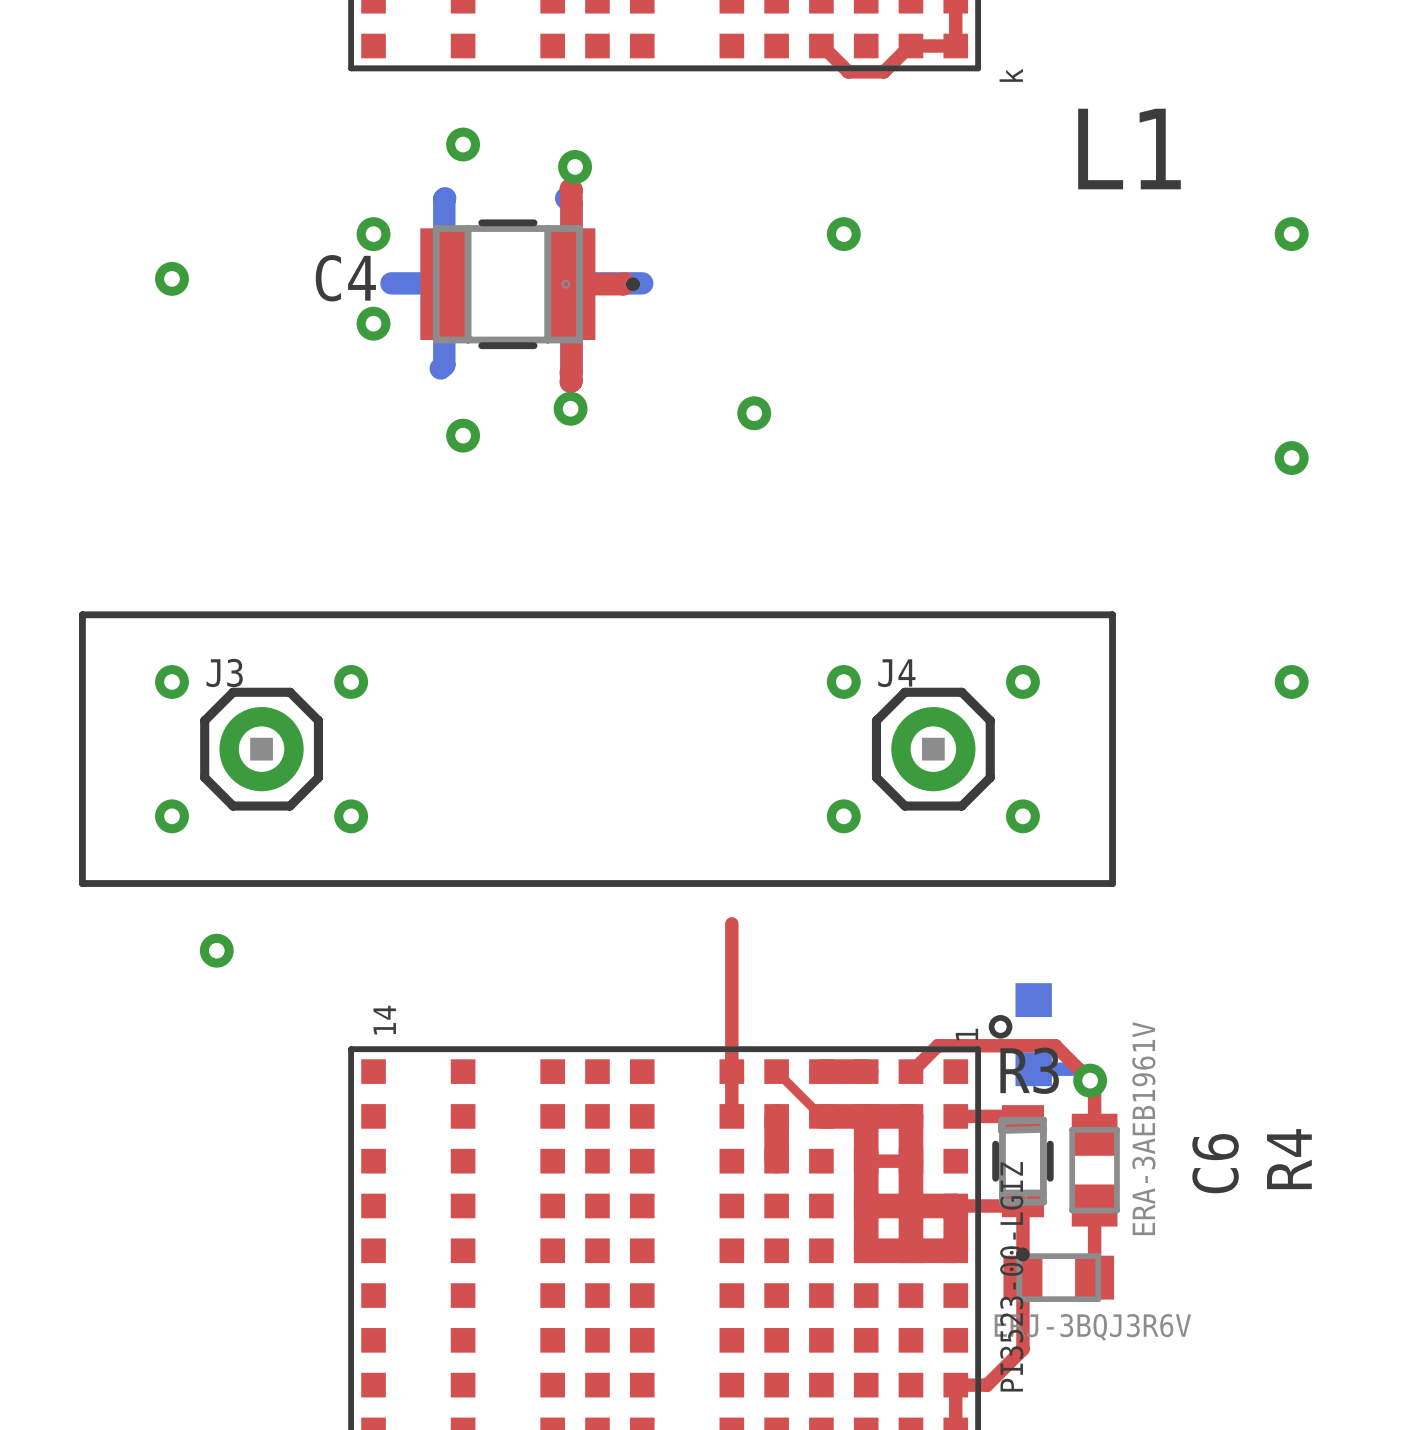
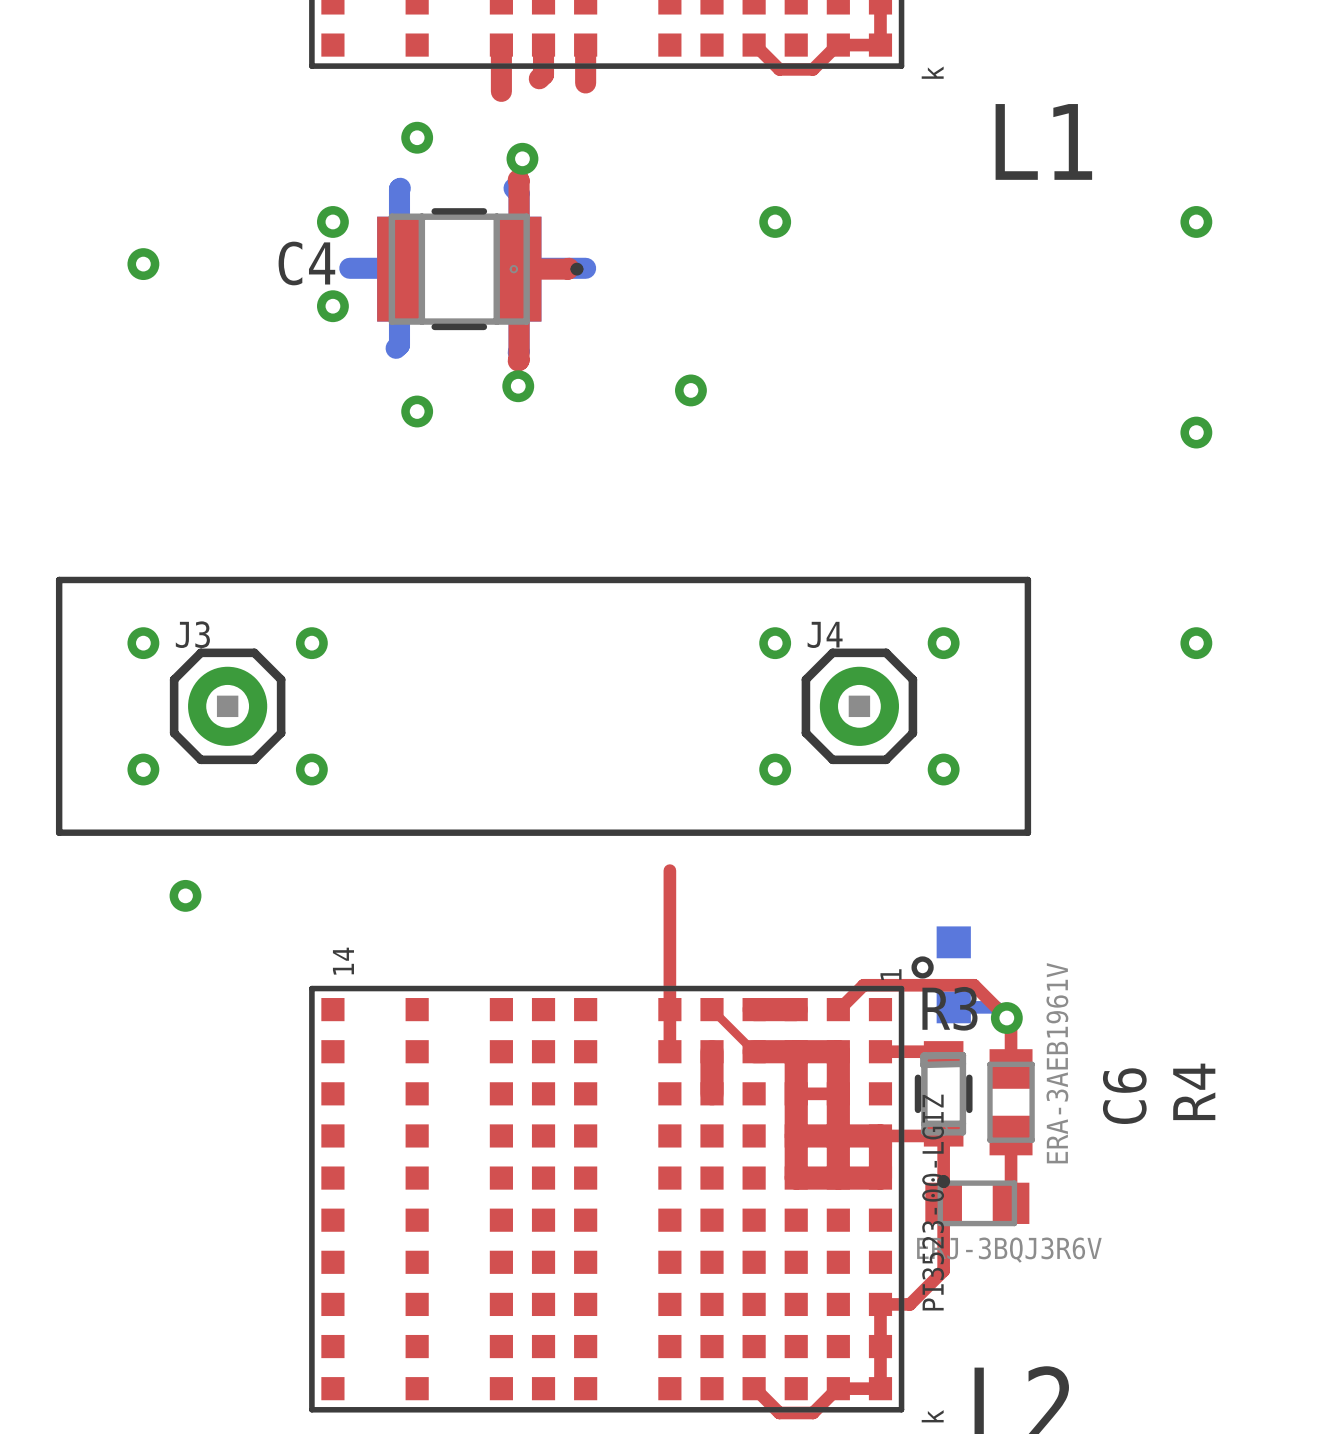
top track: none -> (501, 45) (501, 91)
top track: none -> (543, 45) (543, 74) (539, 78)
top track: none -> (585, 45) (585, 82)

